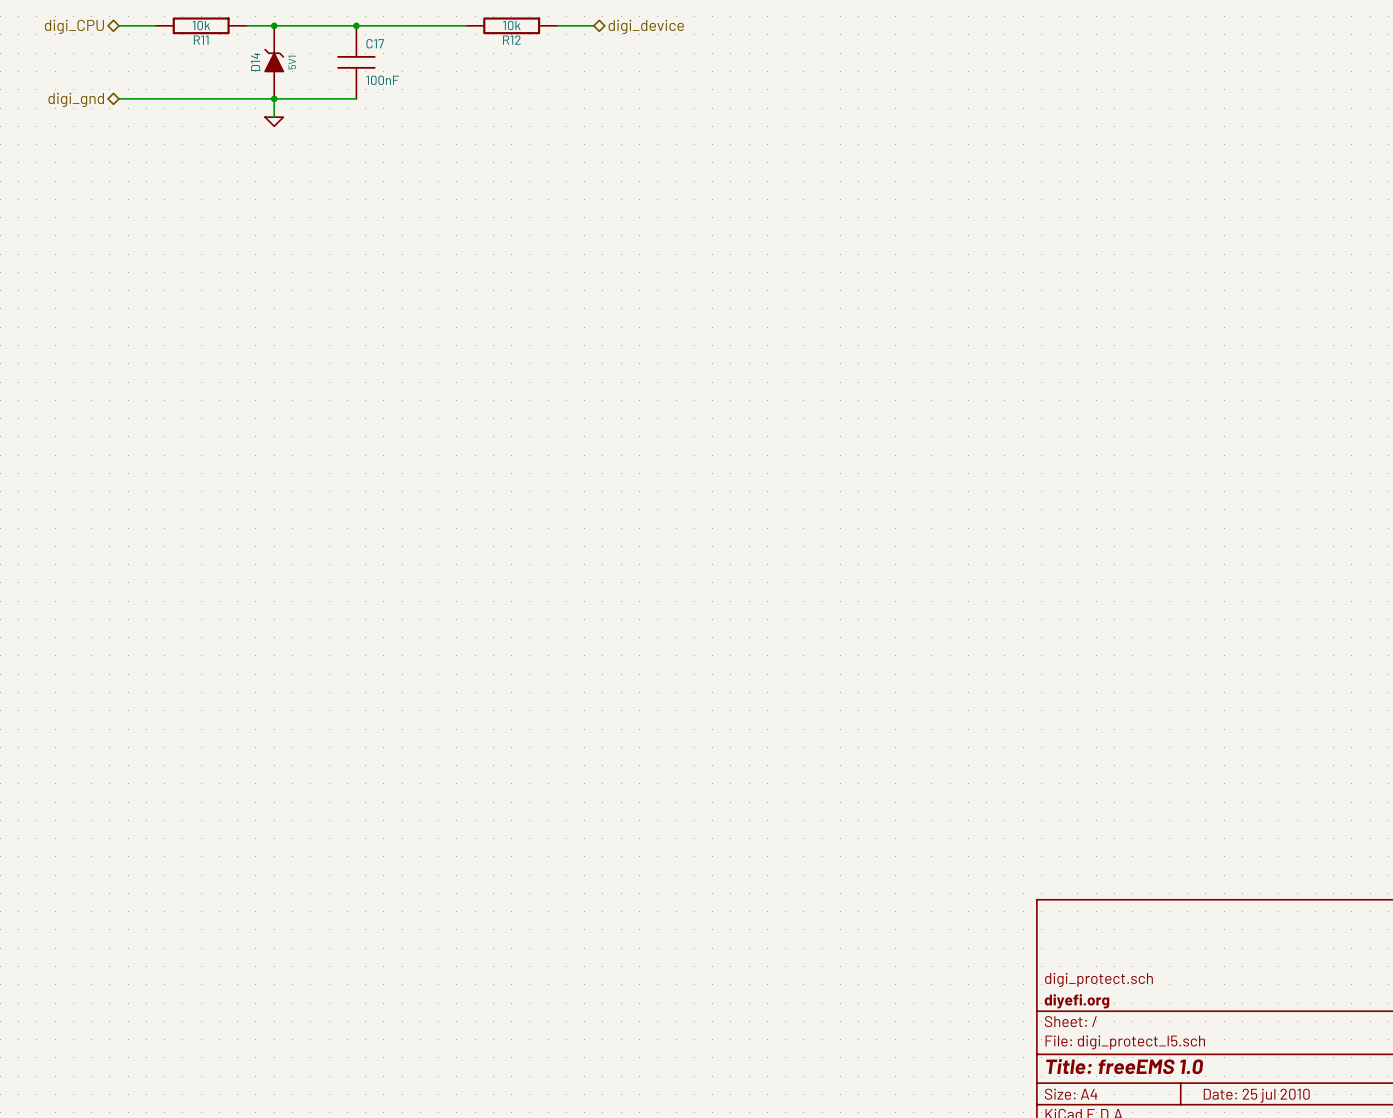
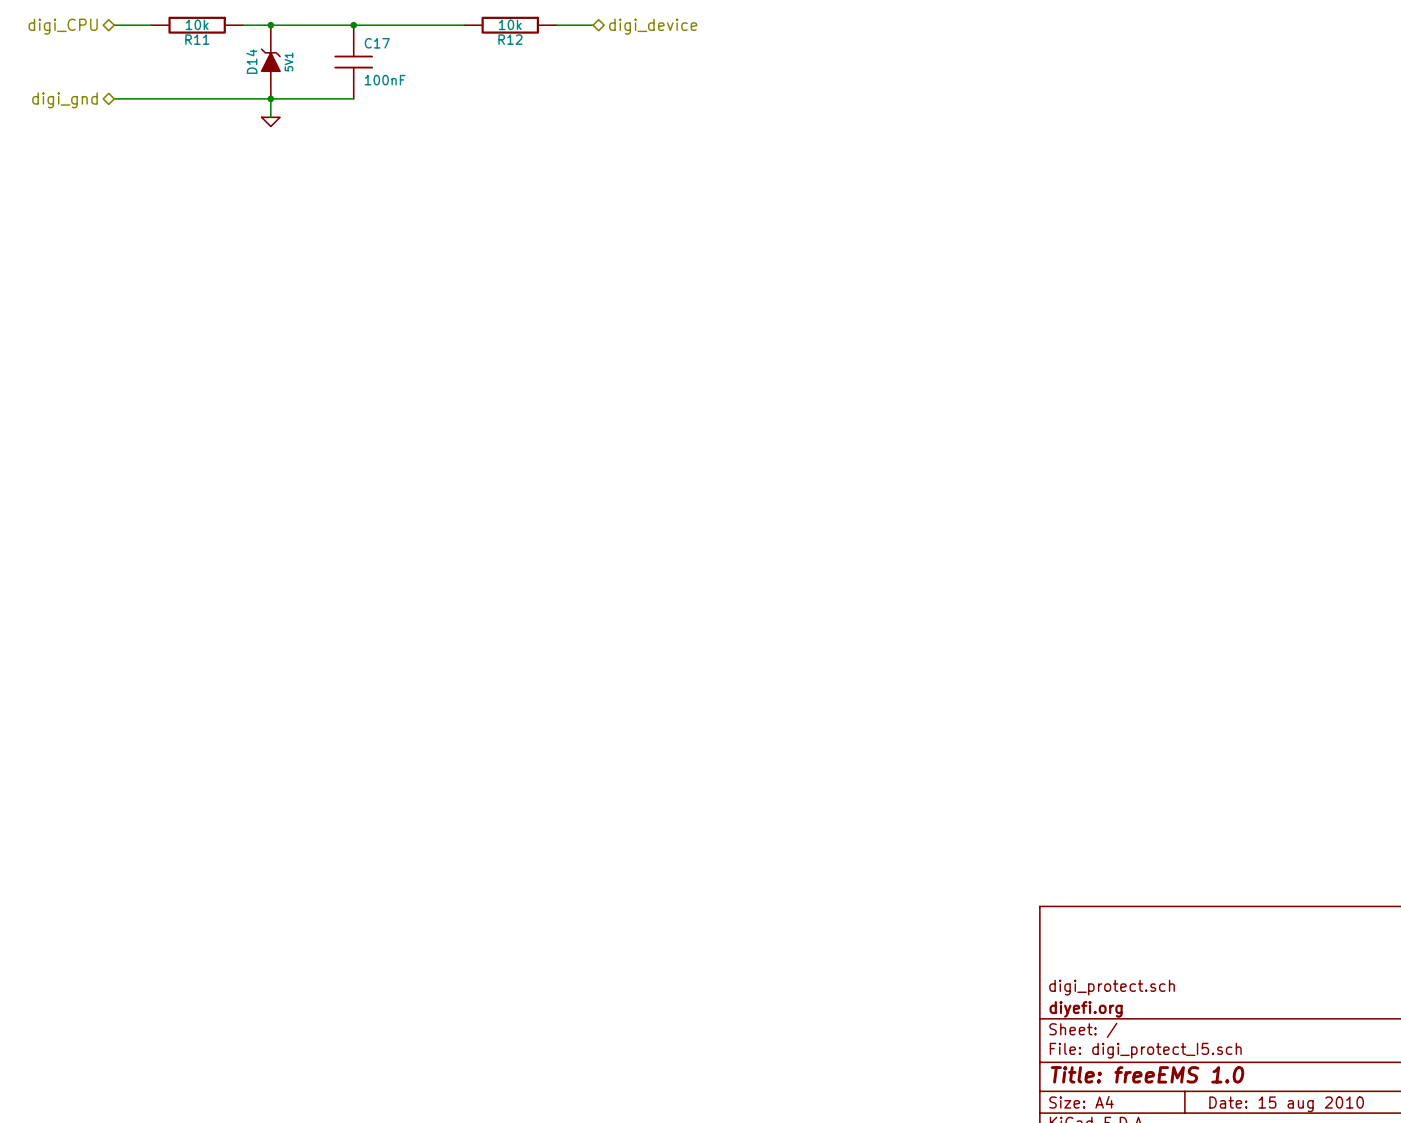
title block: Date: 25 jul 2010 (1256, 1095) -> Date: 15 aug 2010 (1286, 1104)

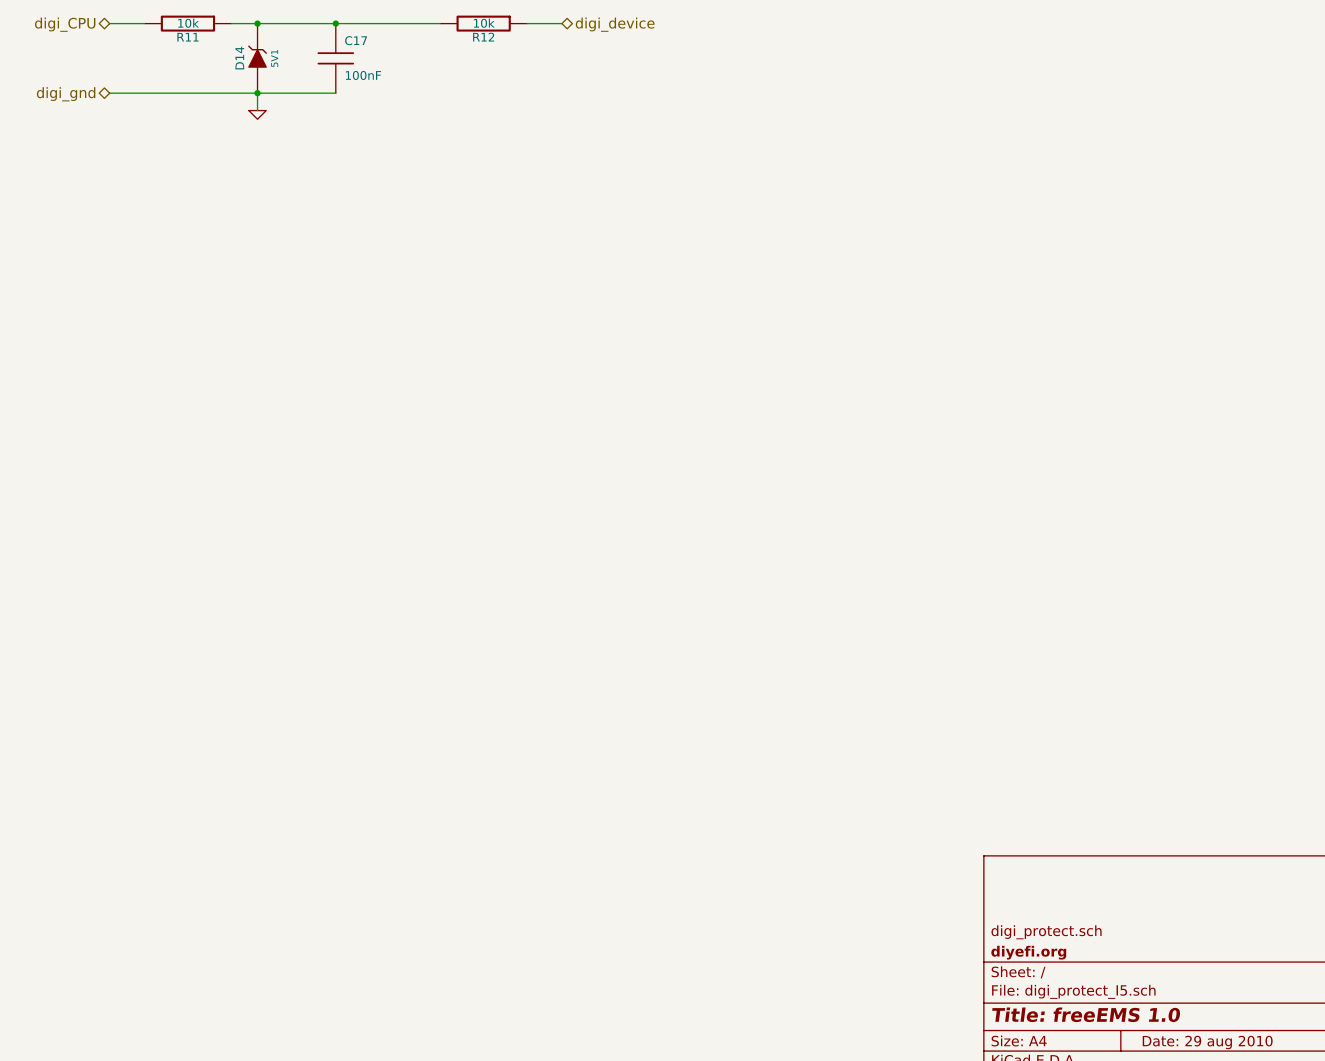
title block: Date: 15 aug 2010 (1286, 1104) -> Date: 29 aug 2010 (1207, 1042)

